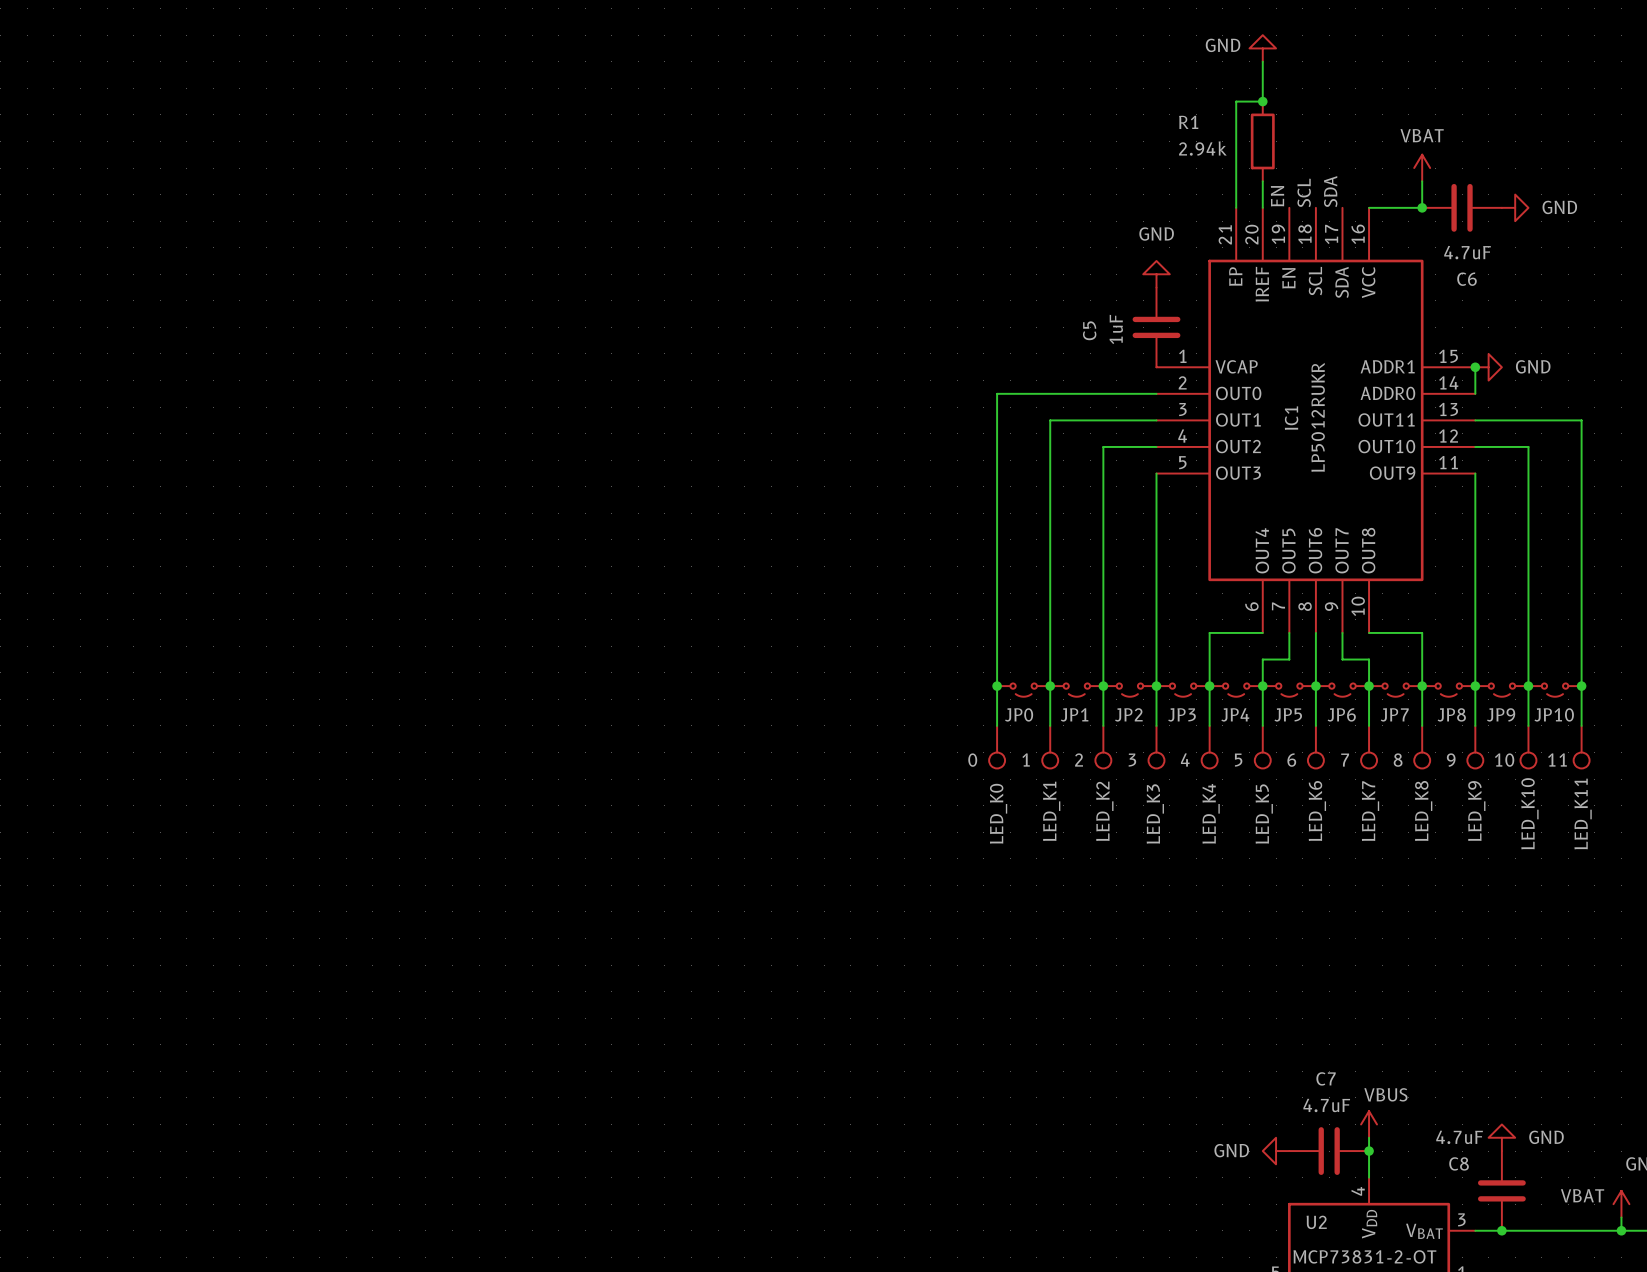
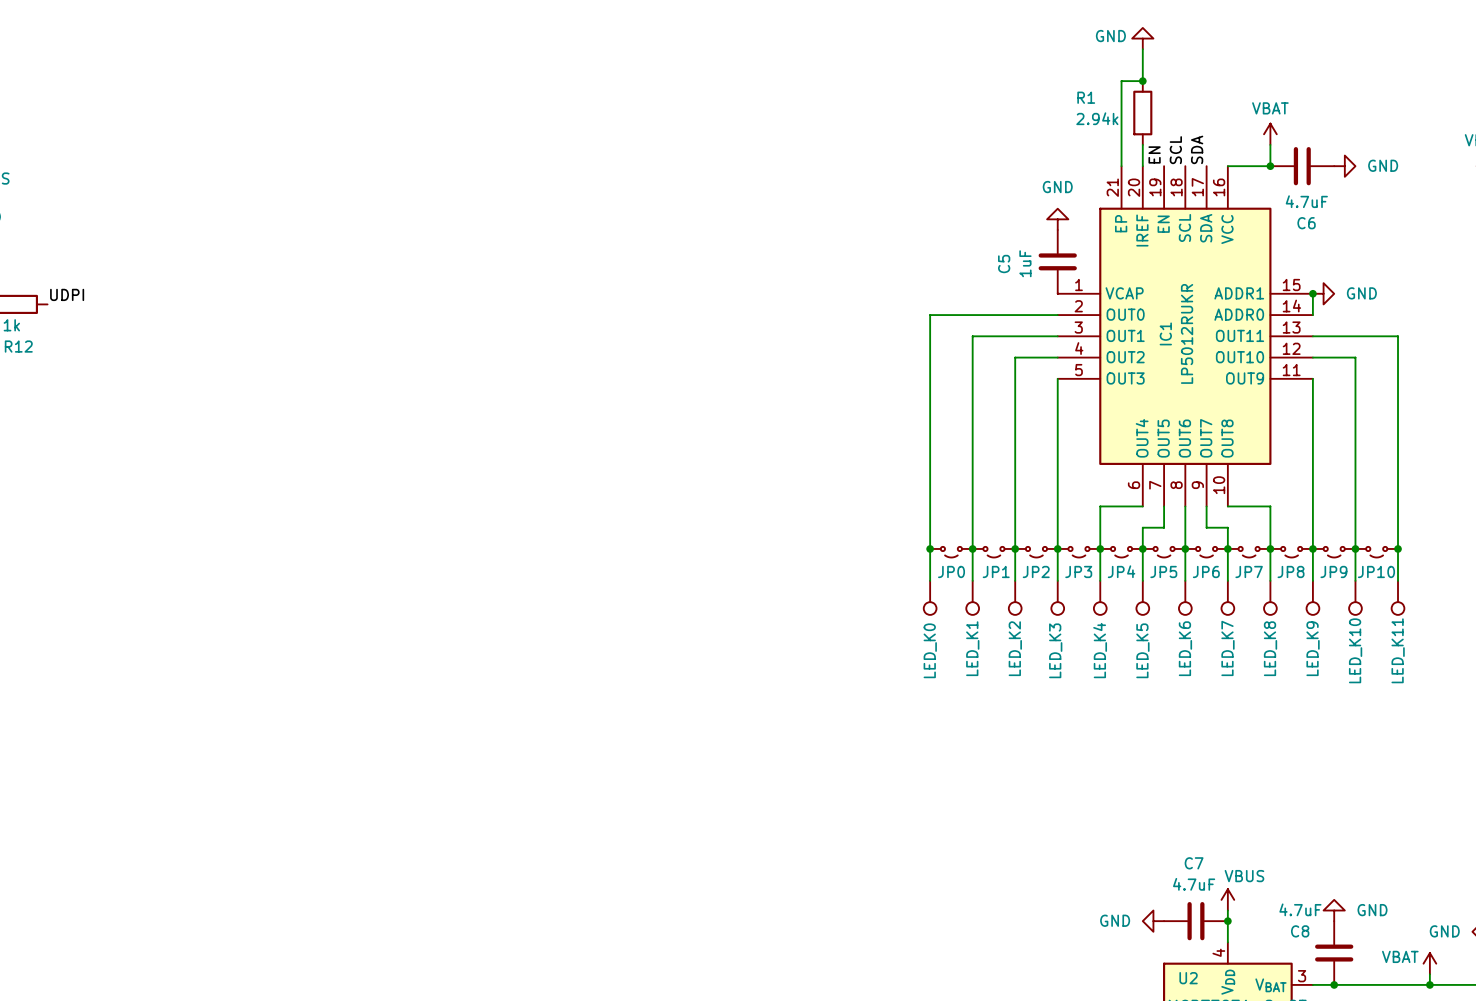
LED_K1 value: 1 (1026, 759) -> none
LED_K4 value: 4 (1185, 759) -> none
LED_K11 value: 11 (1557, 759) -> none
LED_K0 value: 0 (972, 760) -> none
LED_K2 value: 2 (1079, 760) -> none
LED_K3 value: 3 (1132, 760) -> none
LED_K5 value: 5 (1238, 760) -> none
LED_K6 value: 6 (1291, 760) -> none
LED_K7 value: 7 (1345, 760) -> none
LED_K8 value: 8 (1398, 760) -> none
LED_K9 value: 9 (1451, 760) -> none
LED_K10 value: 10 (1504, 760) -> none

